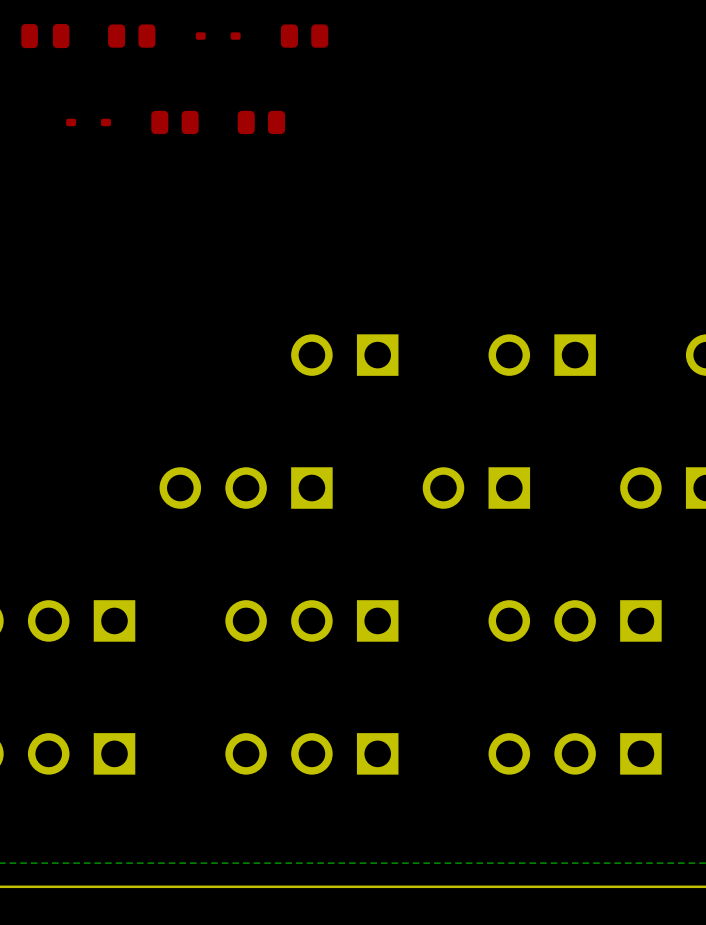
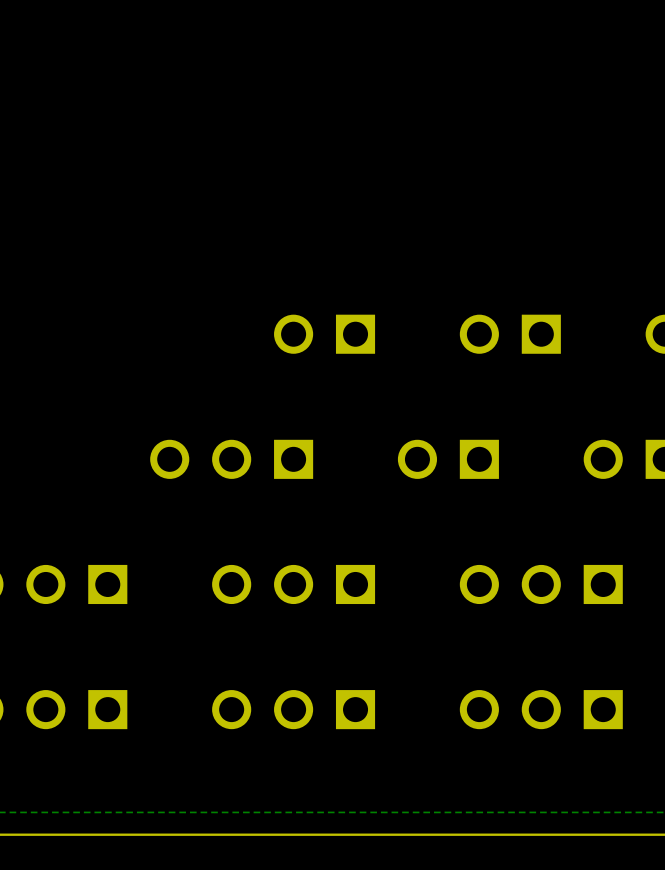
part: (45, 36) -> none
part: (131, 36) -> none
part: (218, 36) -> none
part: (304, 36) -> none
part: (88, 122) -> none
part: (174, 122) -> none
part: (261, 122) -> none

